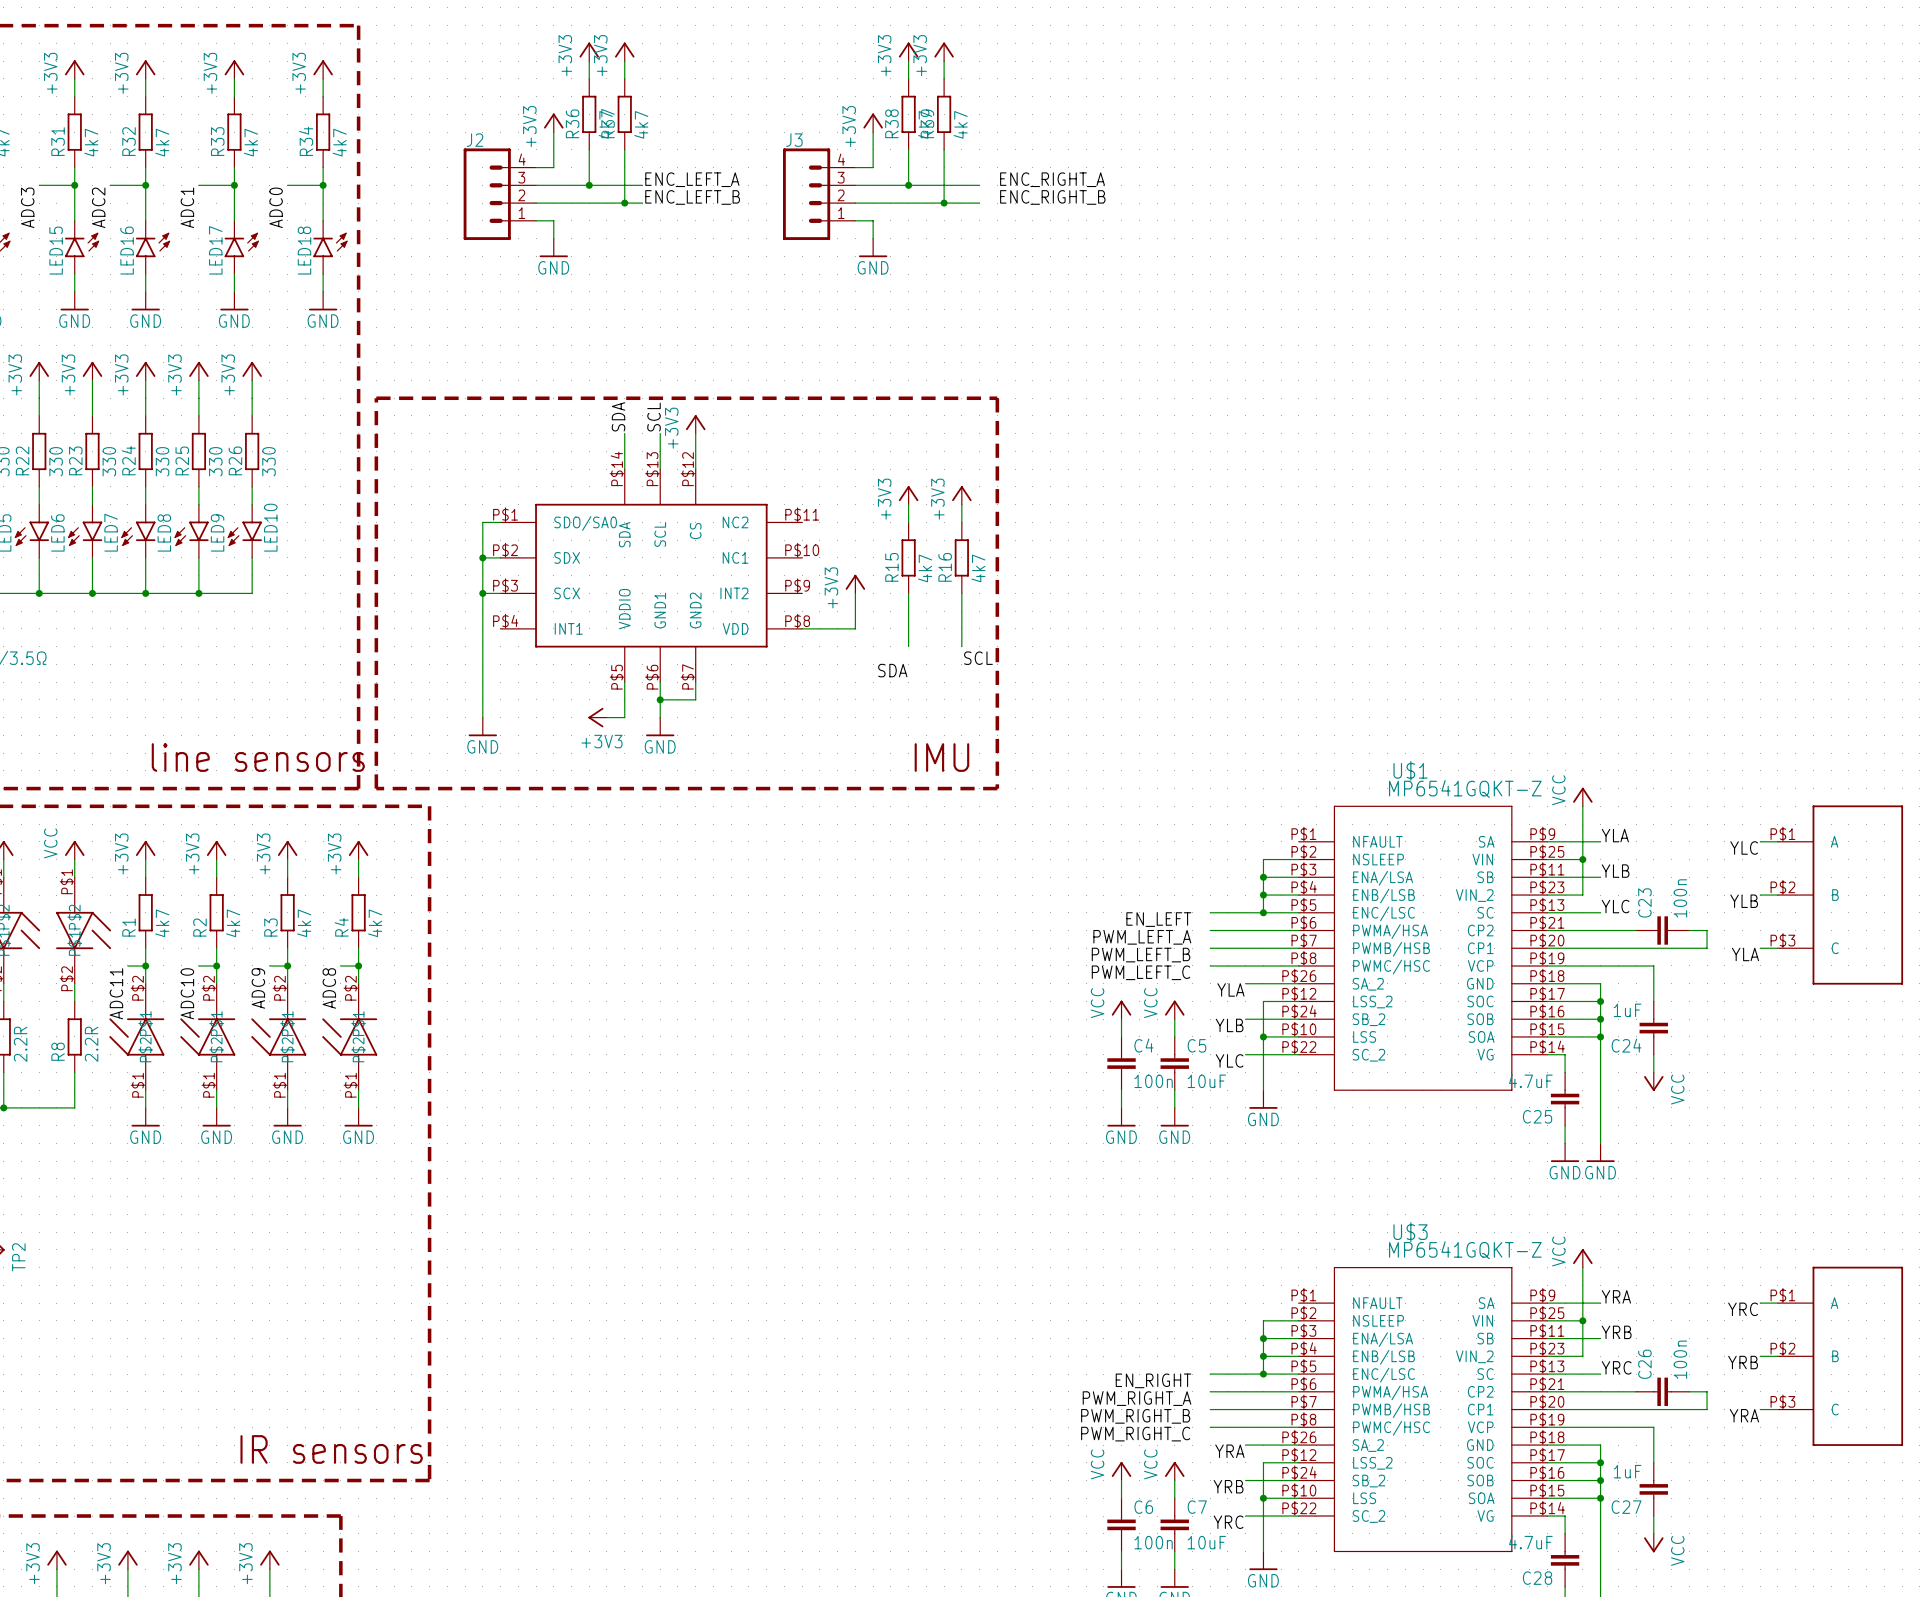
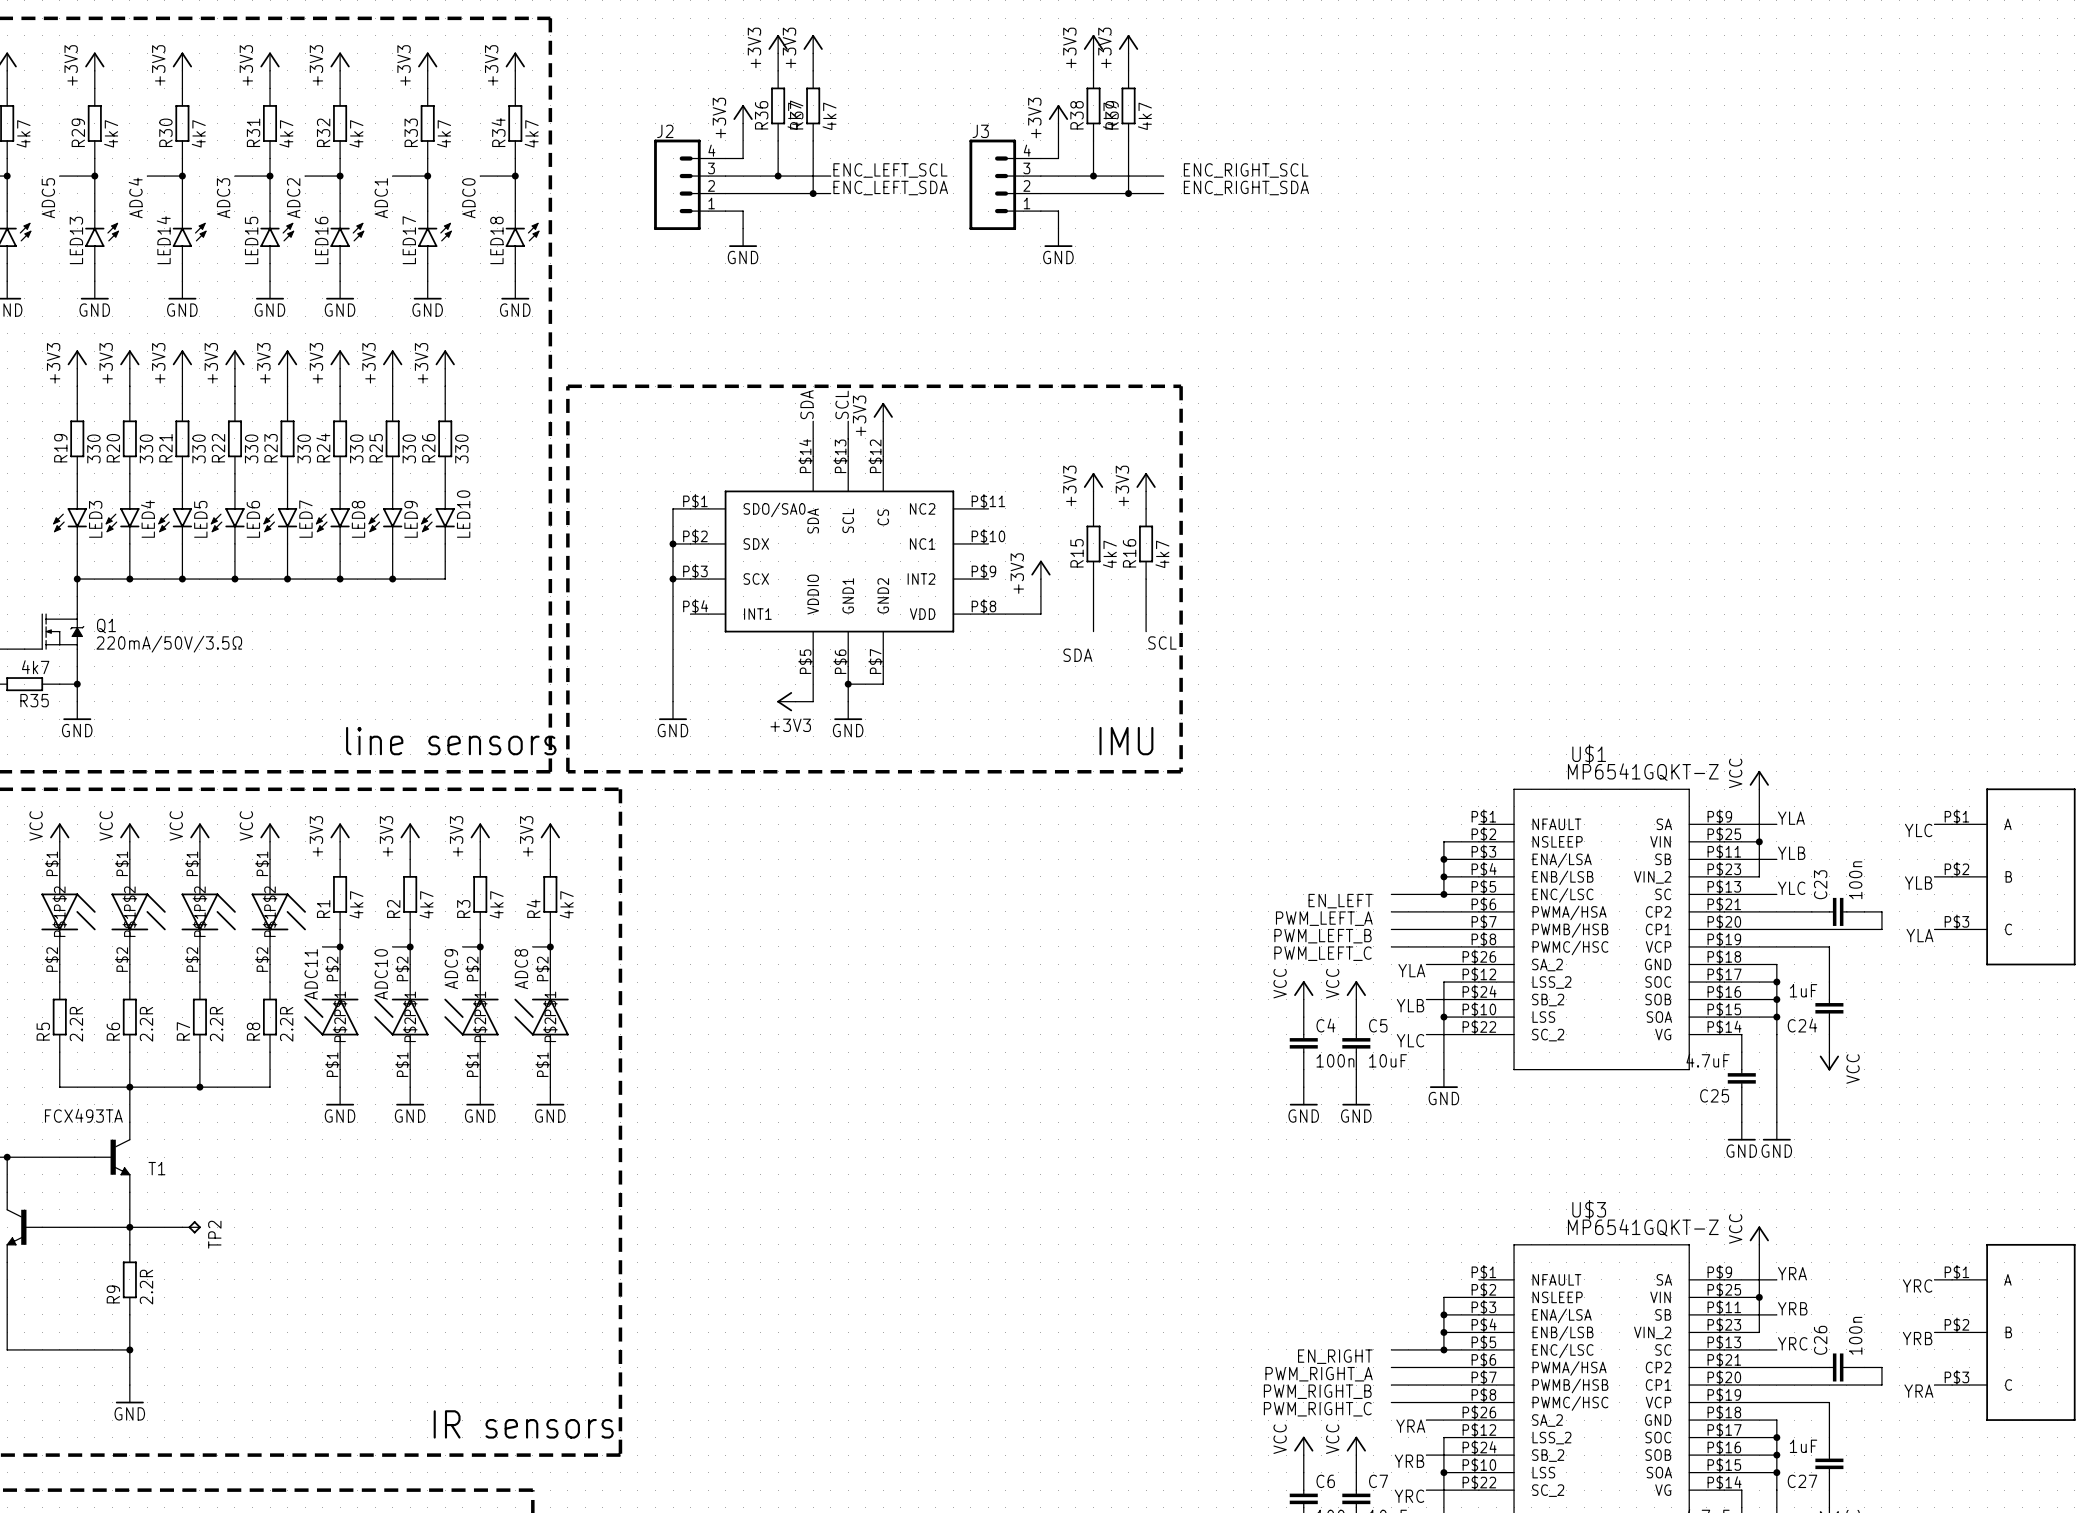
label: ENC_LEFT_A (692, 179) -> ENC_LEFT_SCL (890, 170)
label: ENC_RIGHT_A (1052, 179) -> ENC_RIGHT_SCL (1246, 170)
label: ENC_LEFT_B (692, 197) -> ENC_LEFT_SDA (890, 188)
label: ENC_RIGHT_B (1052, 197) -> ENC_RIGHT_SDA (1246, 188)

